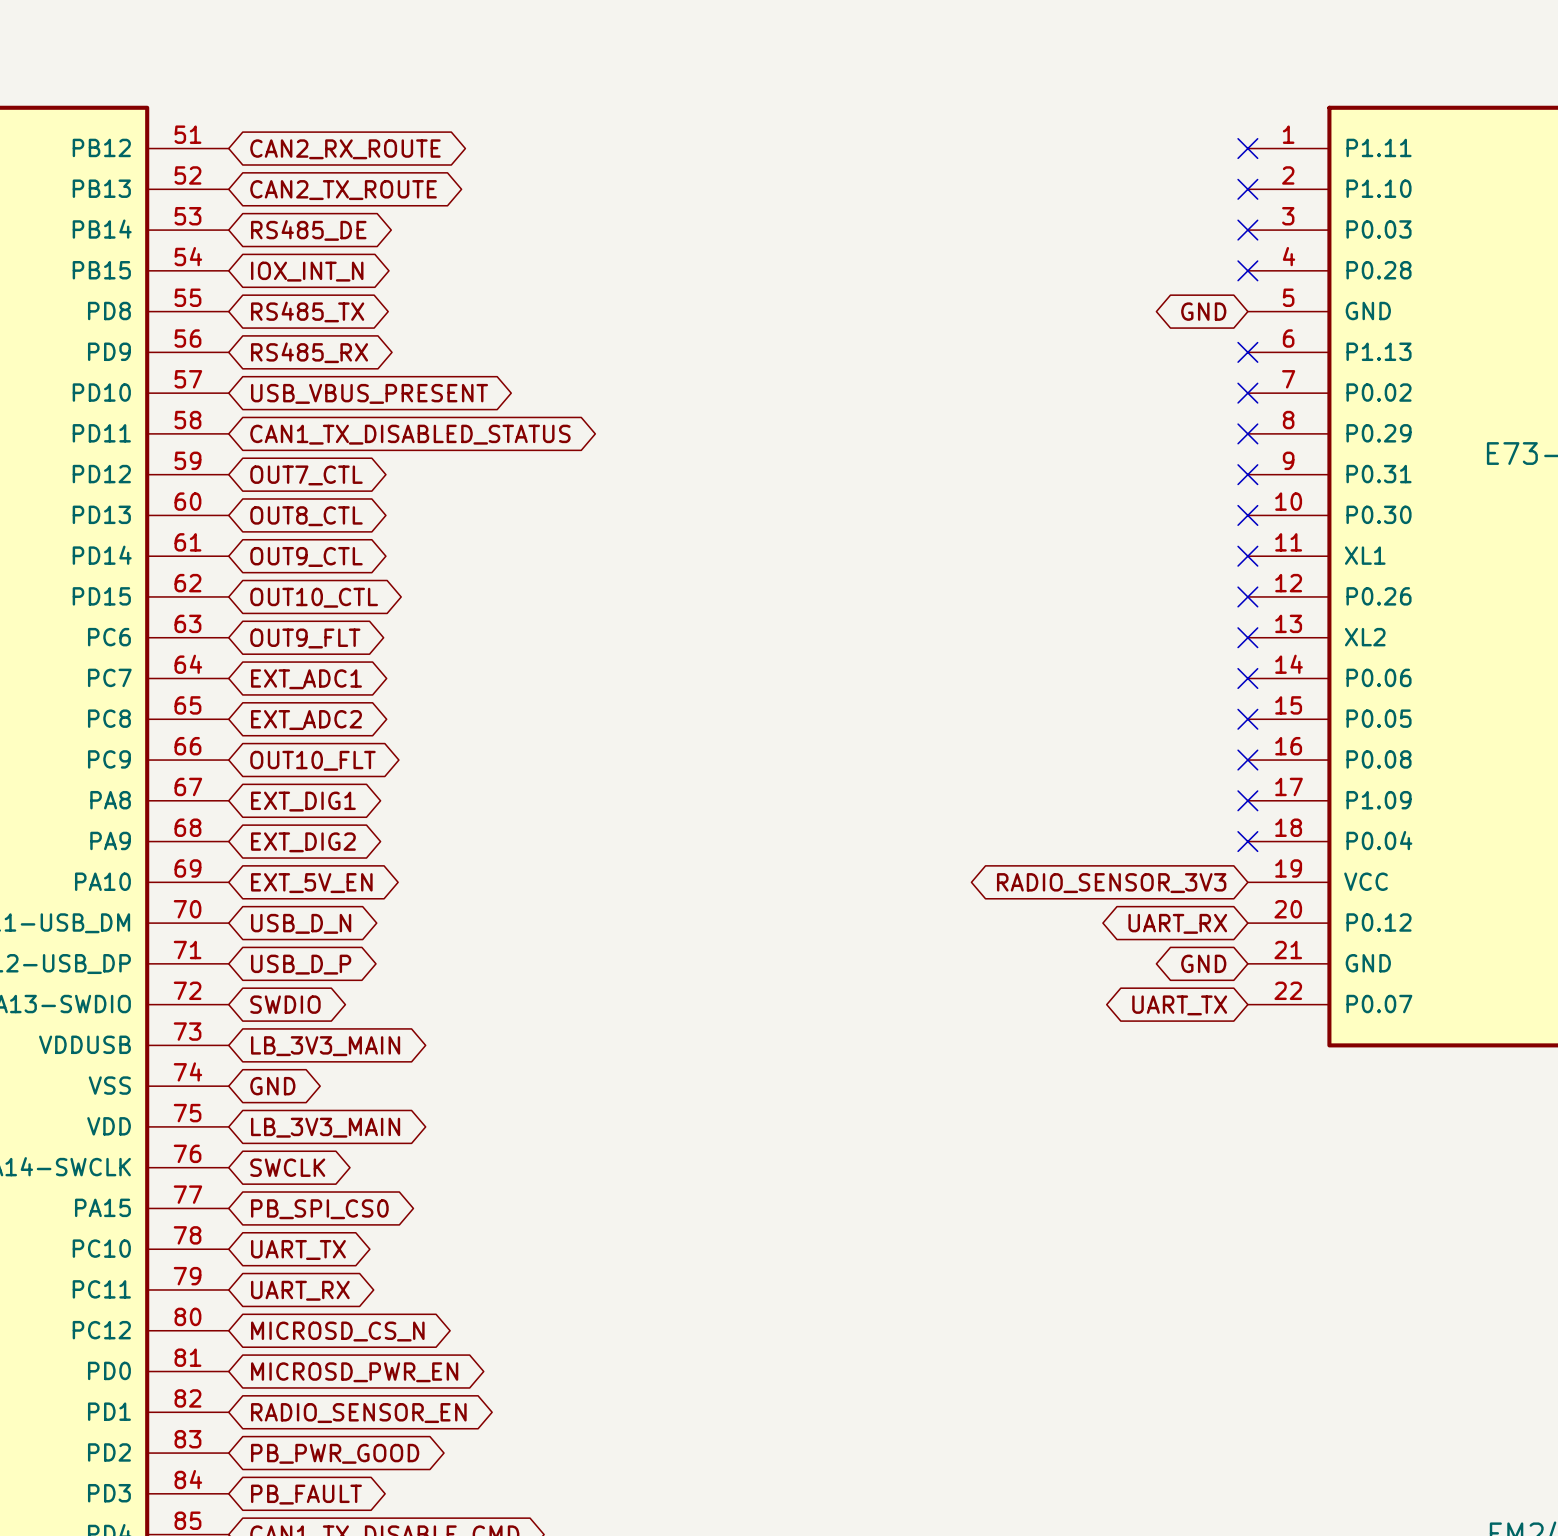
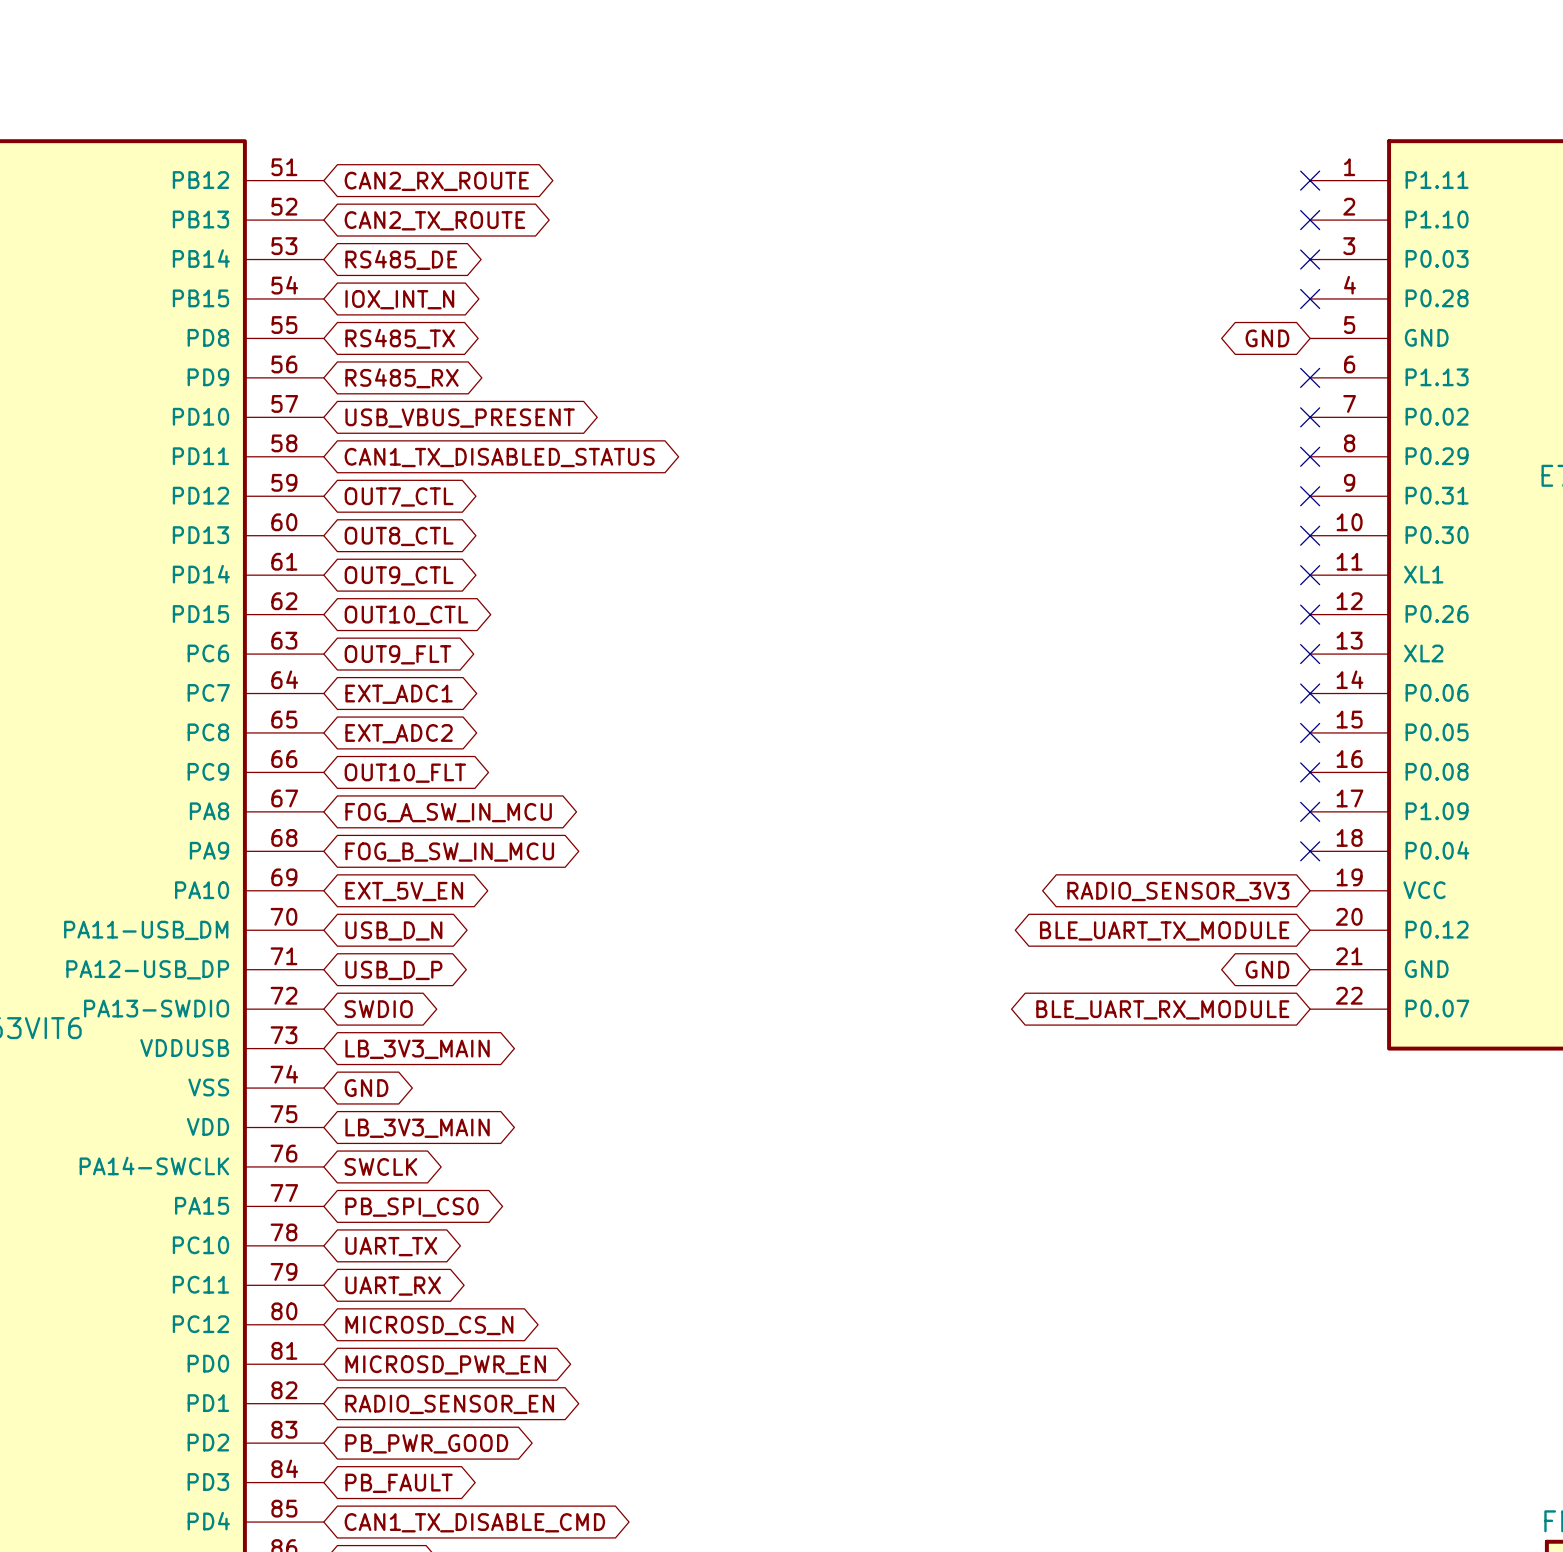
global label: EXT_DIG1 (303, 801) -> FOG_A_SW_IN_MCU (448, 812)
global label: EXT_DIG2 (303, 842) -> FOG_B_SW_IN_MCU (449, 852)
global label: UART_RX (1177, 923) -> BLE_UART_TX_MODULE (1164, 930)
global label: UART_TX (1179, 1005) -> BLE_UART_RX_MODULE (1162, 1009)

